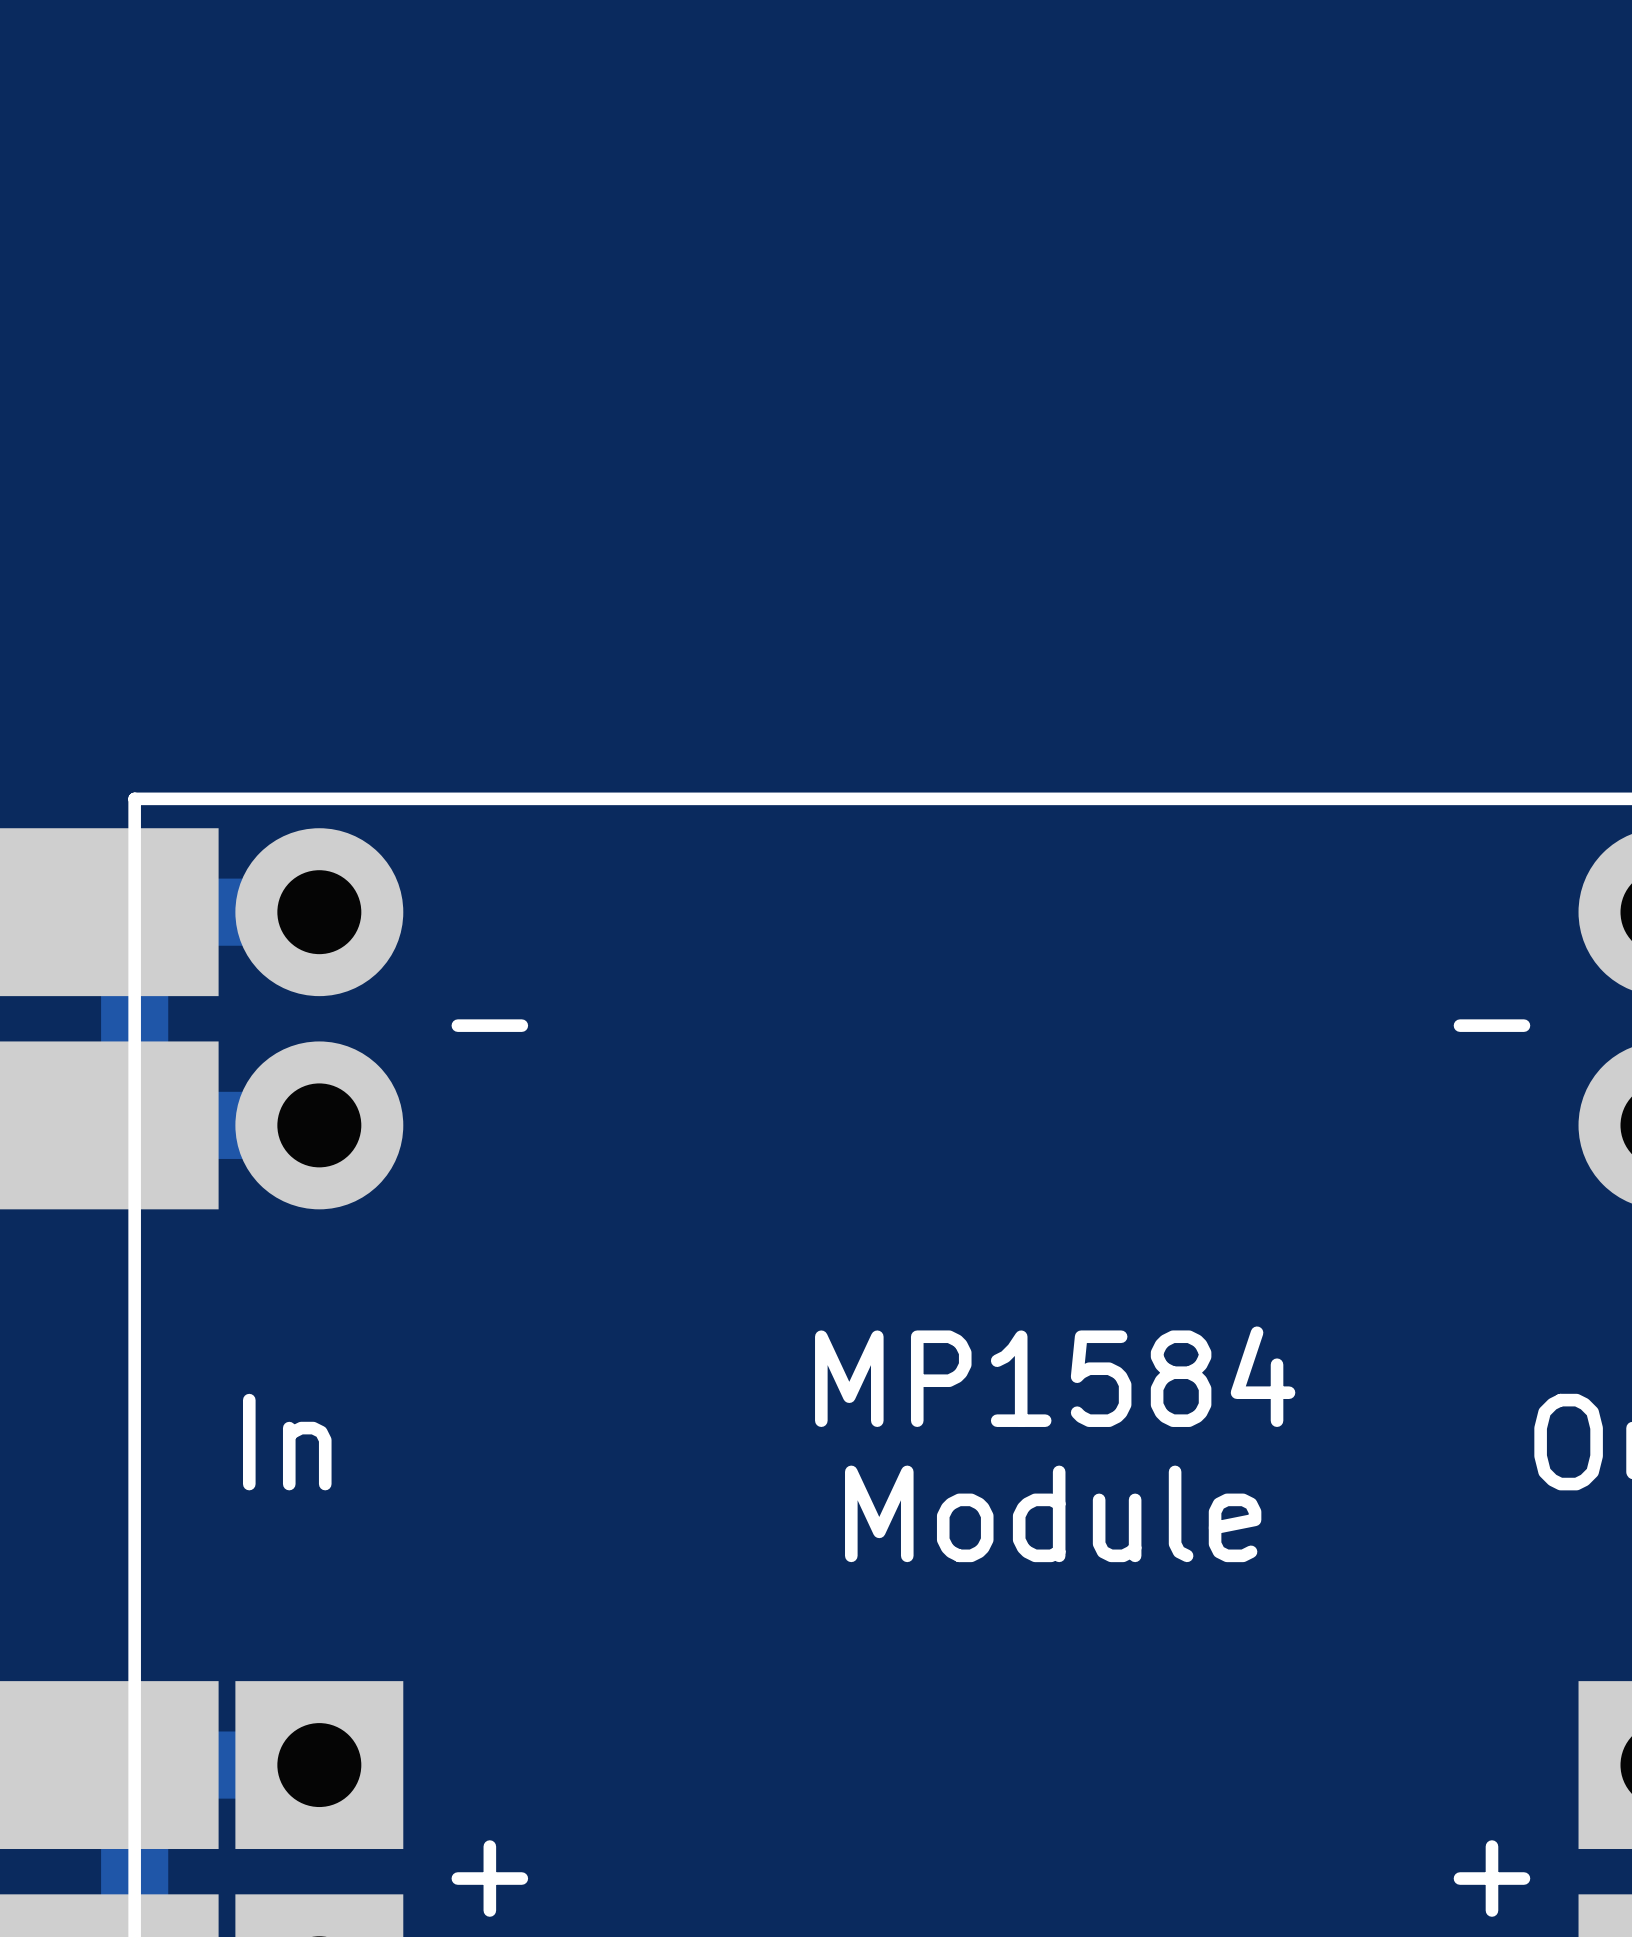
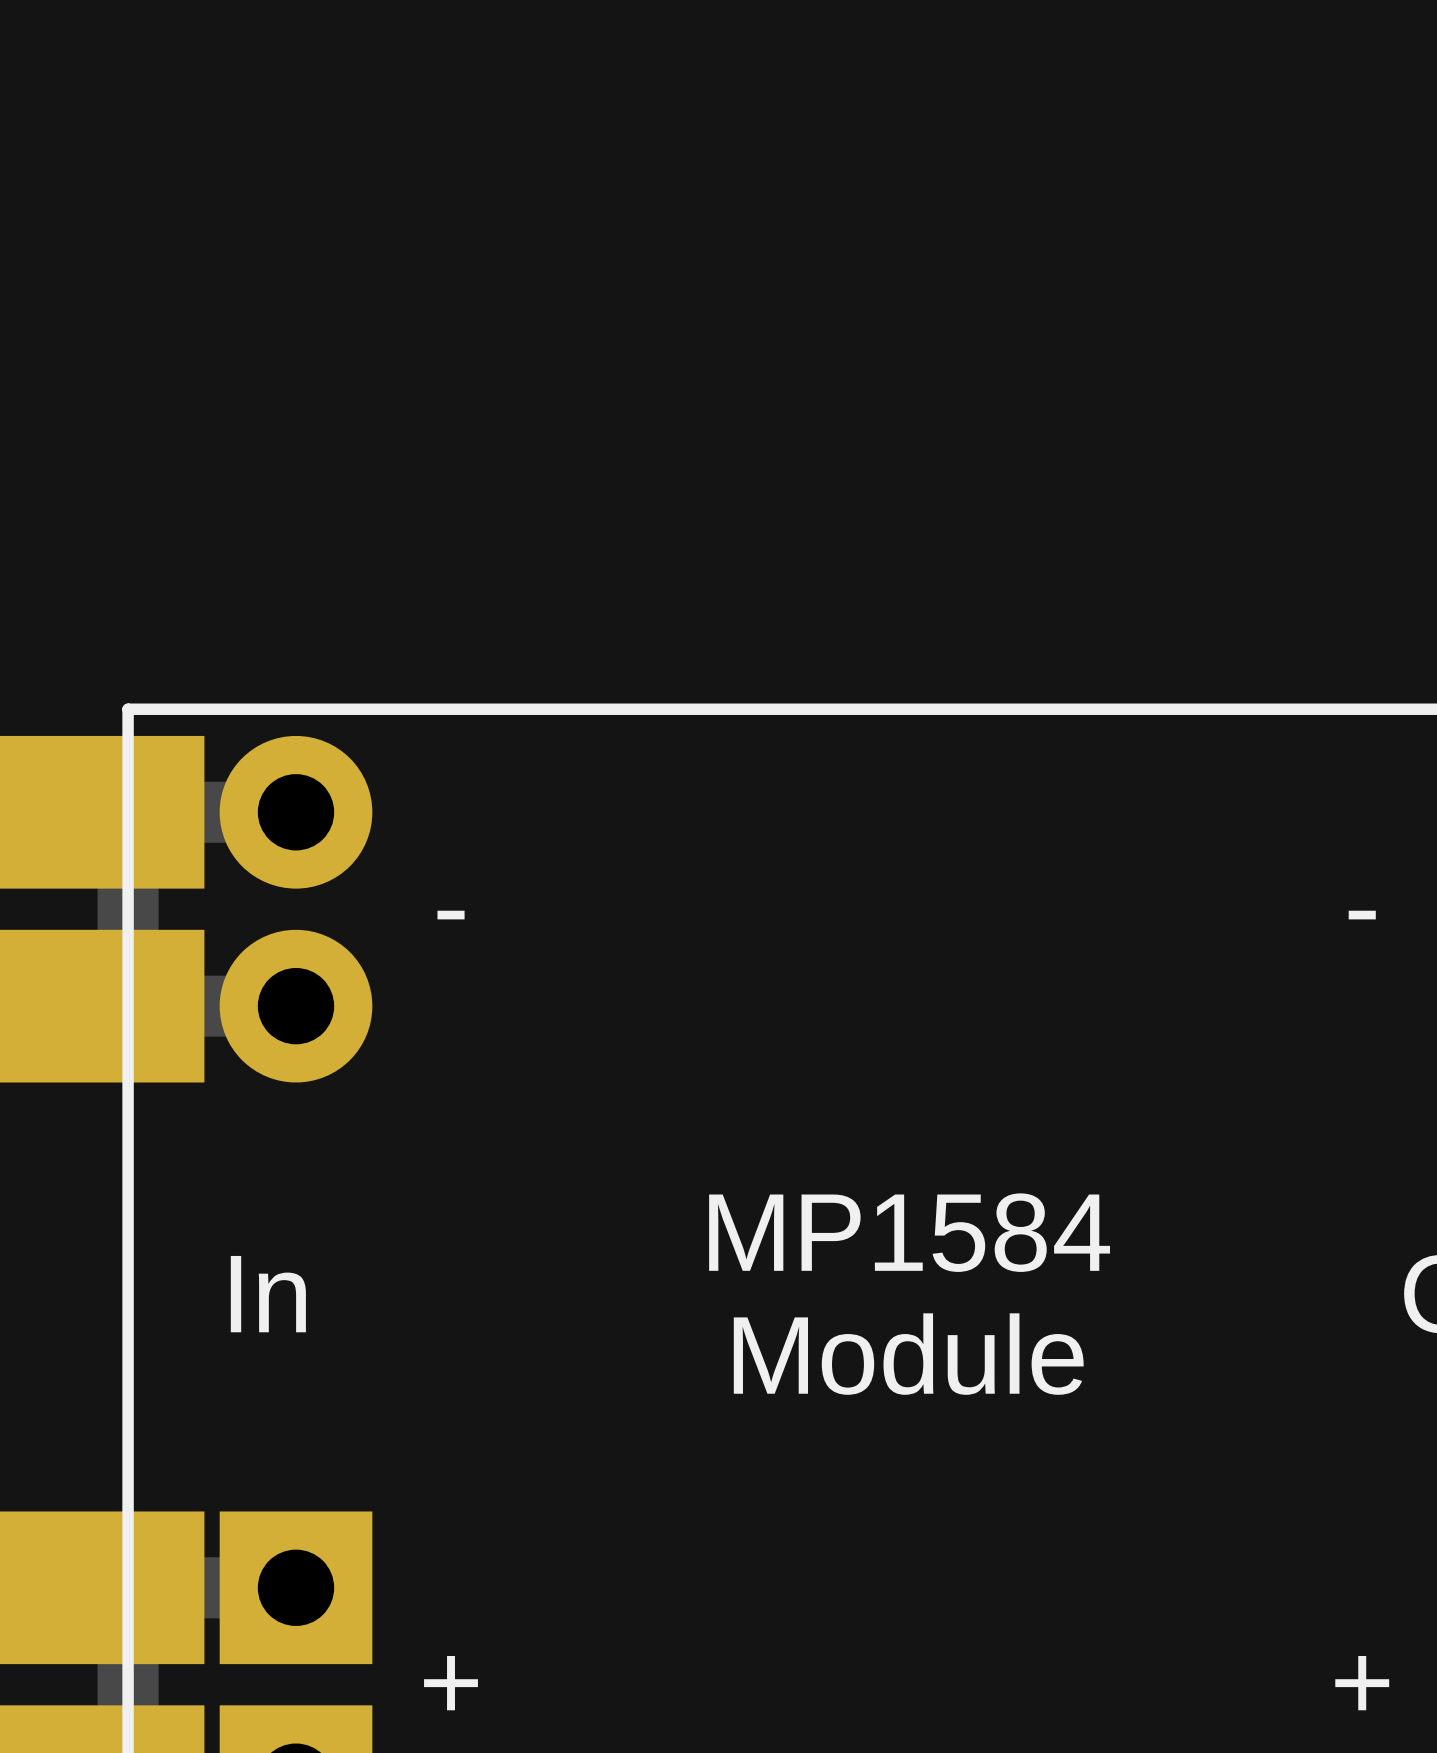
text position: MP1584 (1055, 1376) -> MP1584 (909, 1232)
text position: Module (1053, 1513) -> Module (908, 1354)

